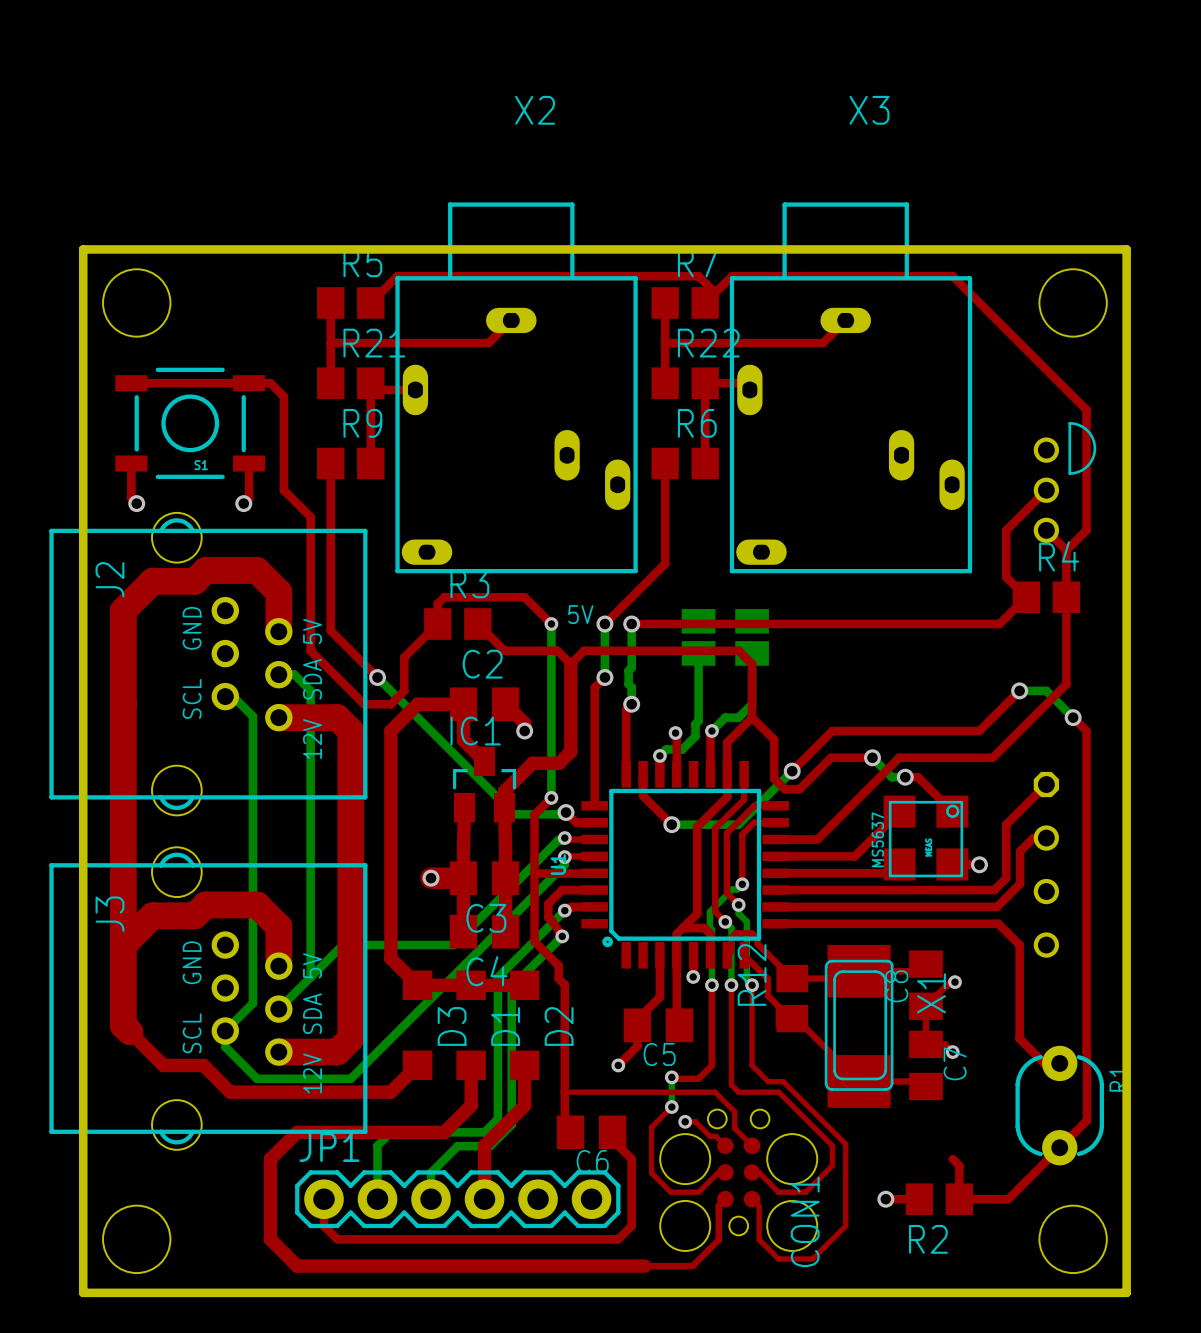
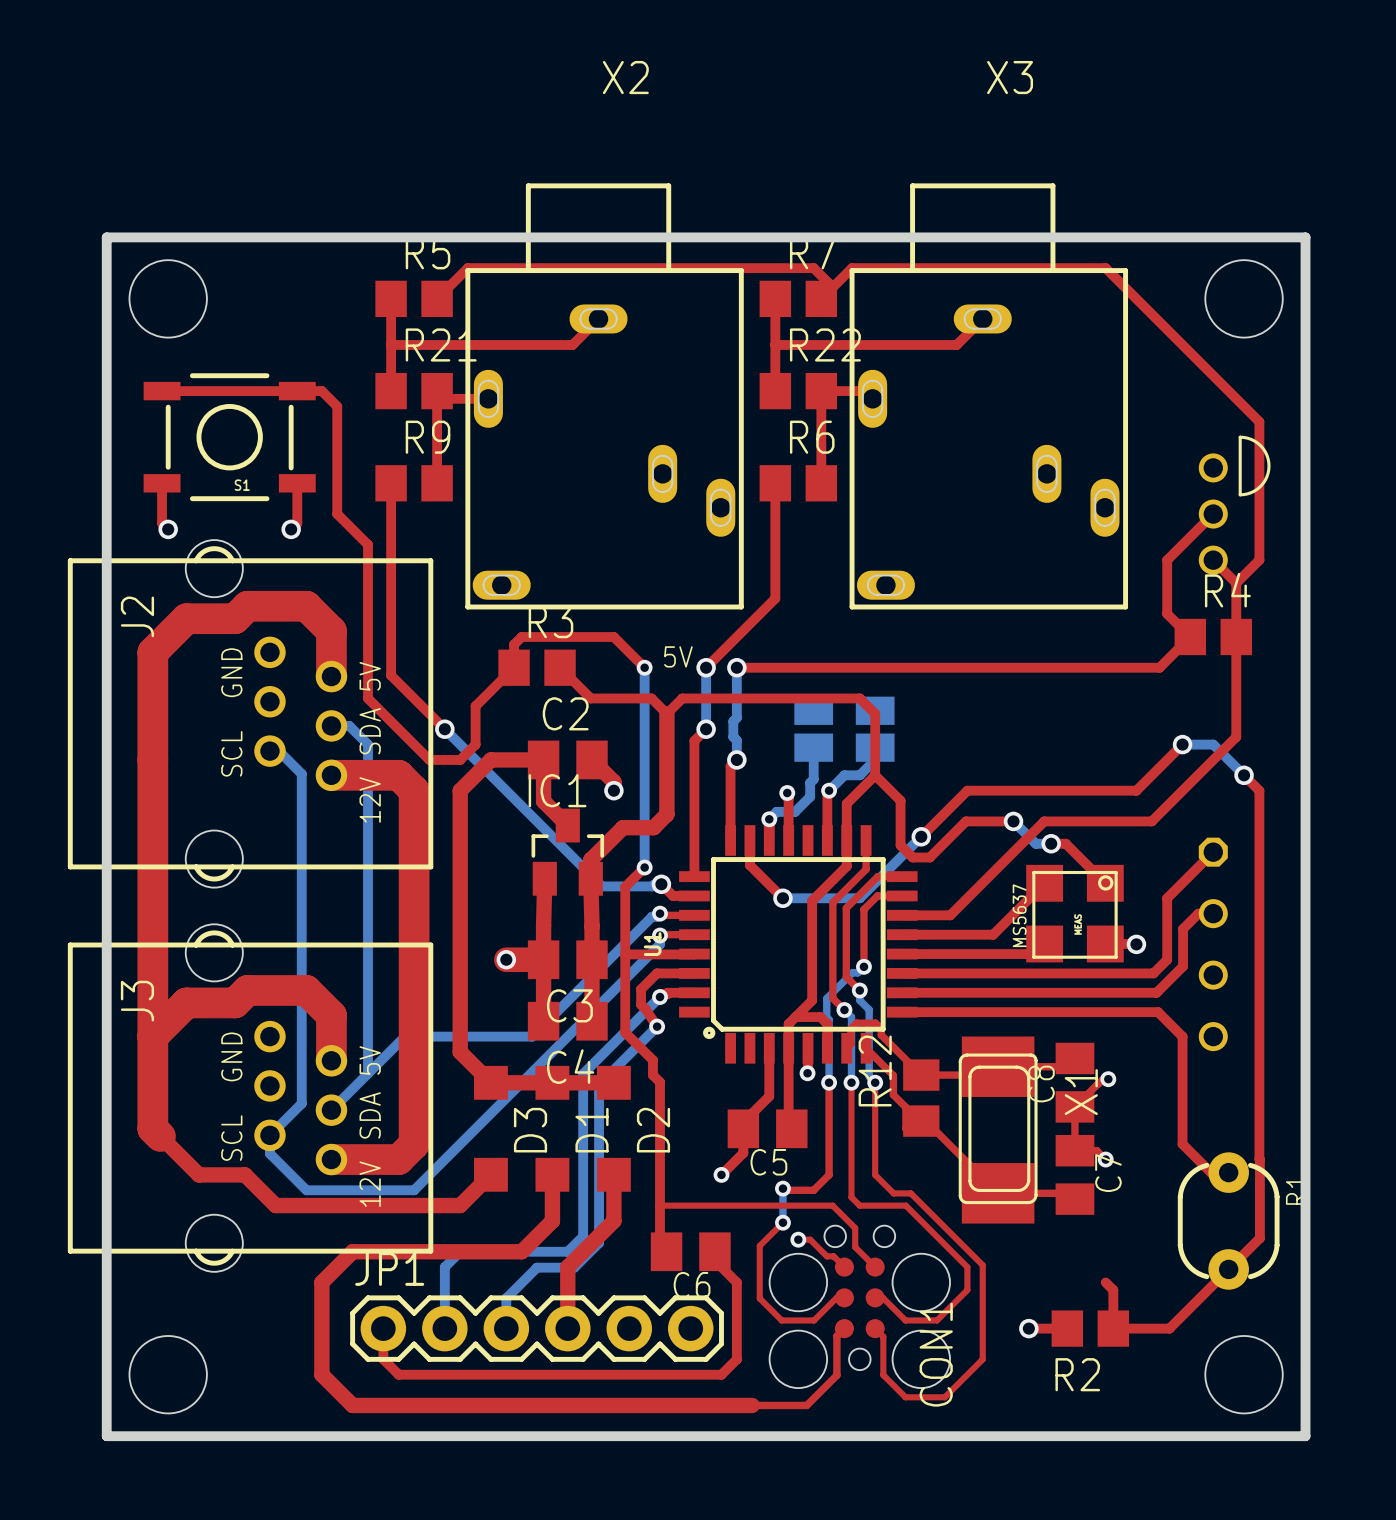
part: (698, 637) -> none
part: (752, 637) -> none
bottom track: (698, 653) (698, 693) -> none
part: none -> (813, 729)
part: none -> (875, 729)

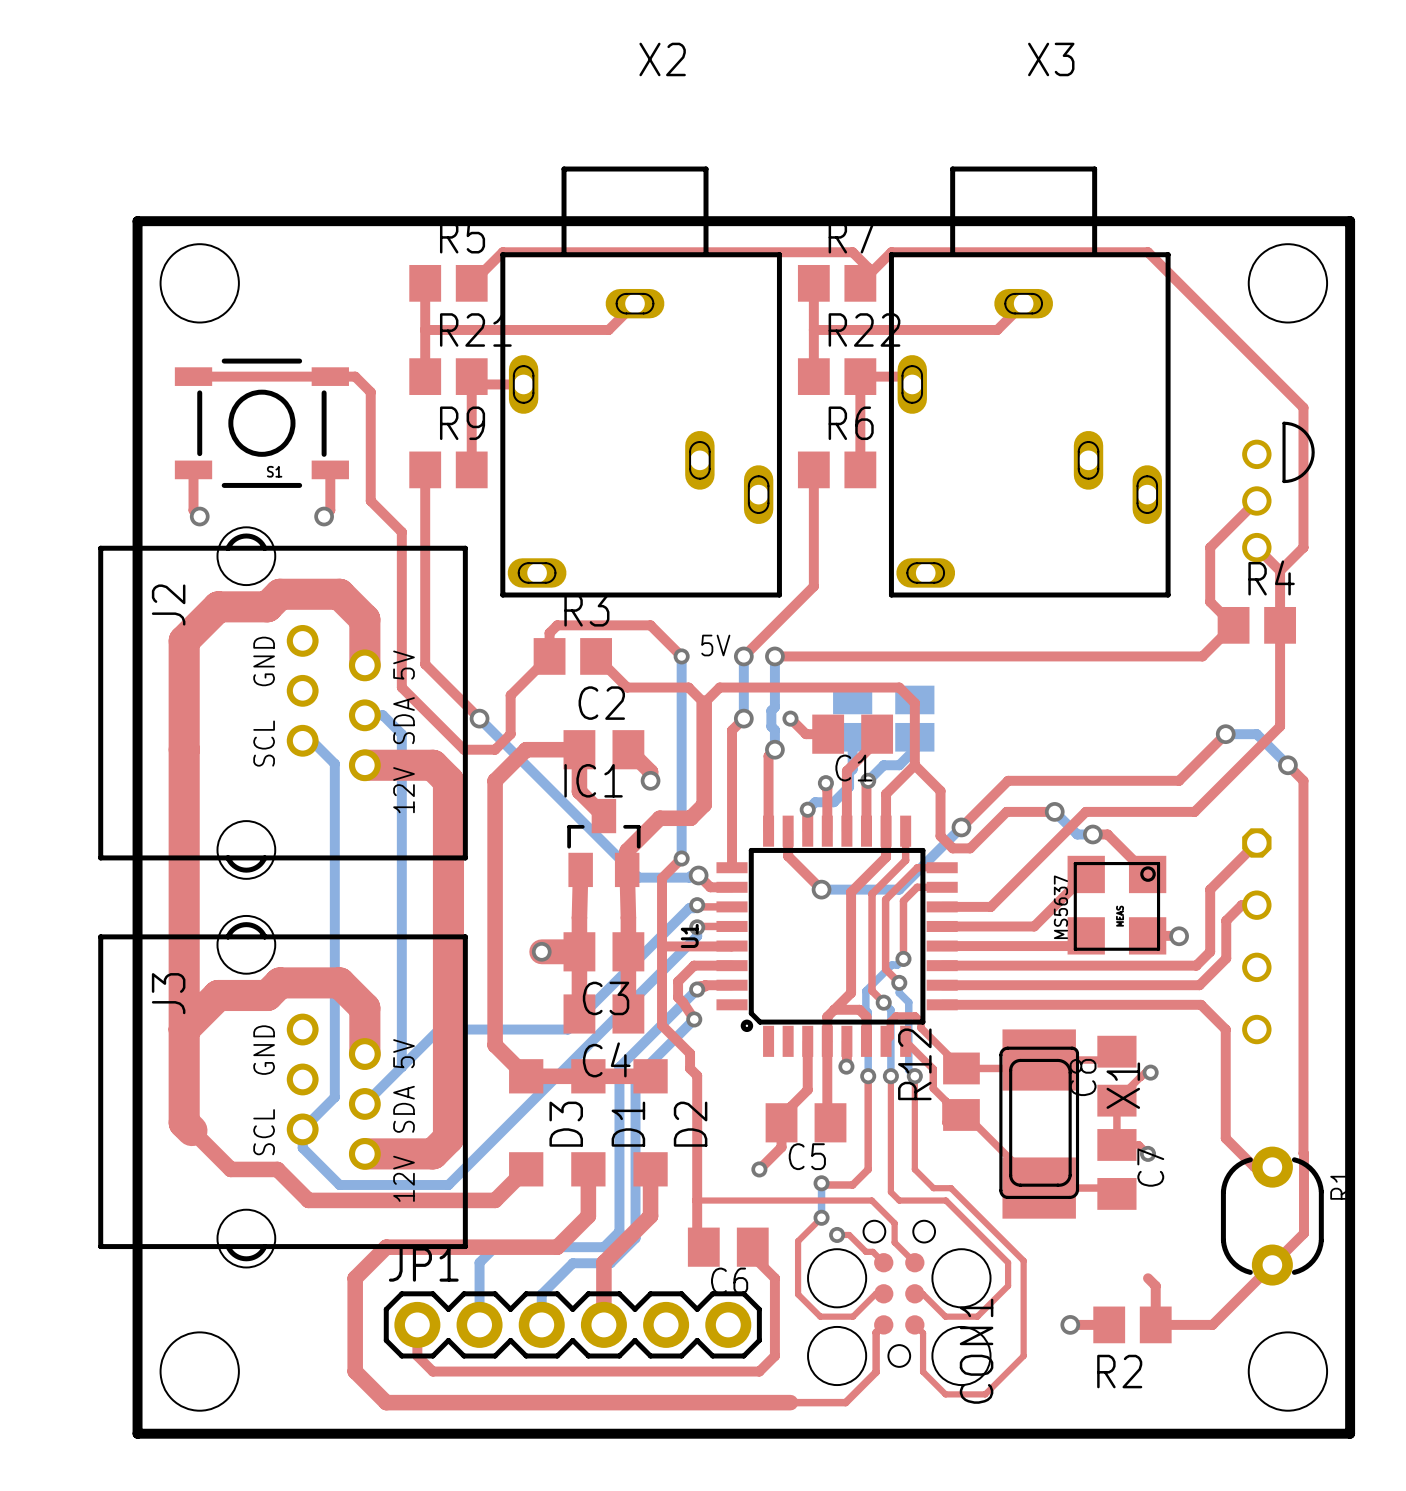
top track: none -> (790, 718) (806, 734) (828, 734)
via: none -> (790, 718)
C1: none -> (852, 734)
top track: none -> (877, 734) (877, 740) (846, 771) (846, 831)

